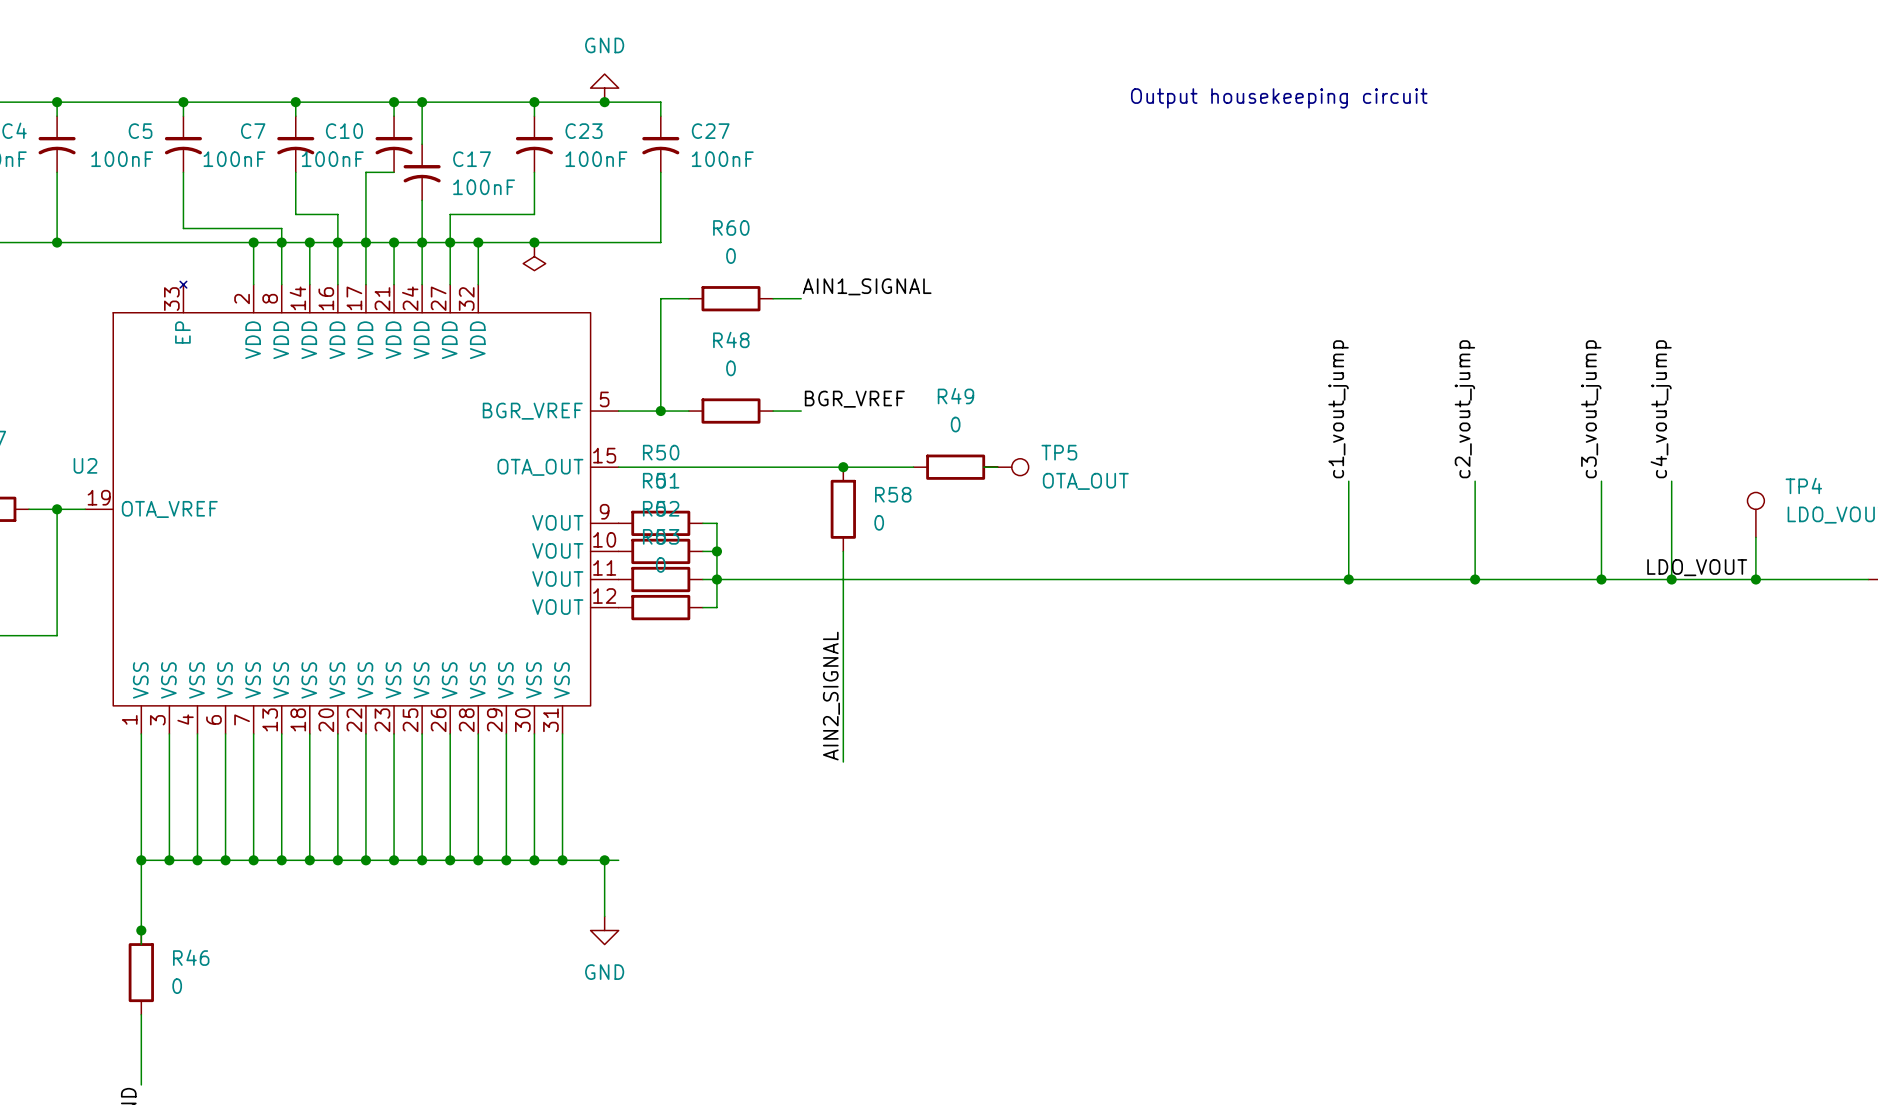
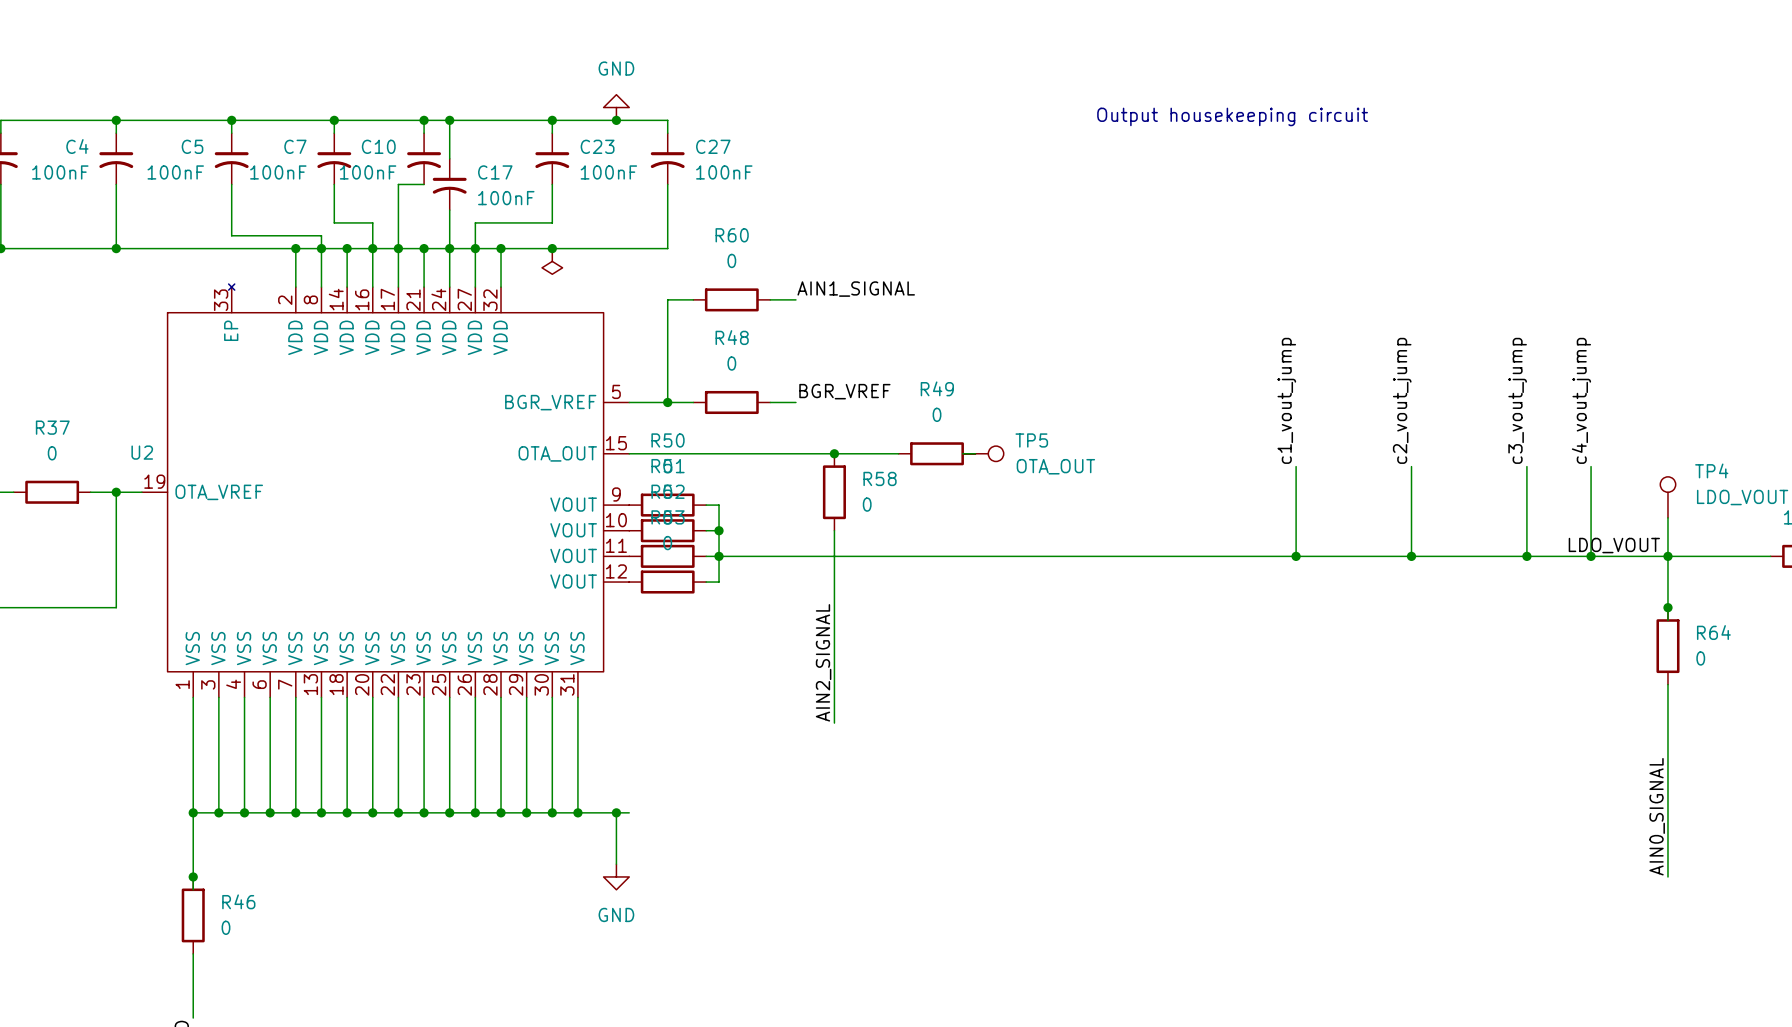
wire: none -> (1667, 556) (1667, 620)
junction: none -> (1667, 607)
R64: none -> 0 (1667, 646)
wire: none -> (1667, 684) (1667, 876)
label: none -> AIN0_SIGNAL (1657, 816)

